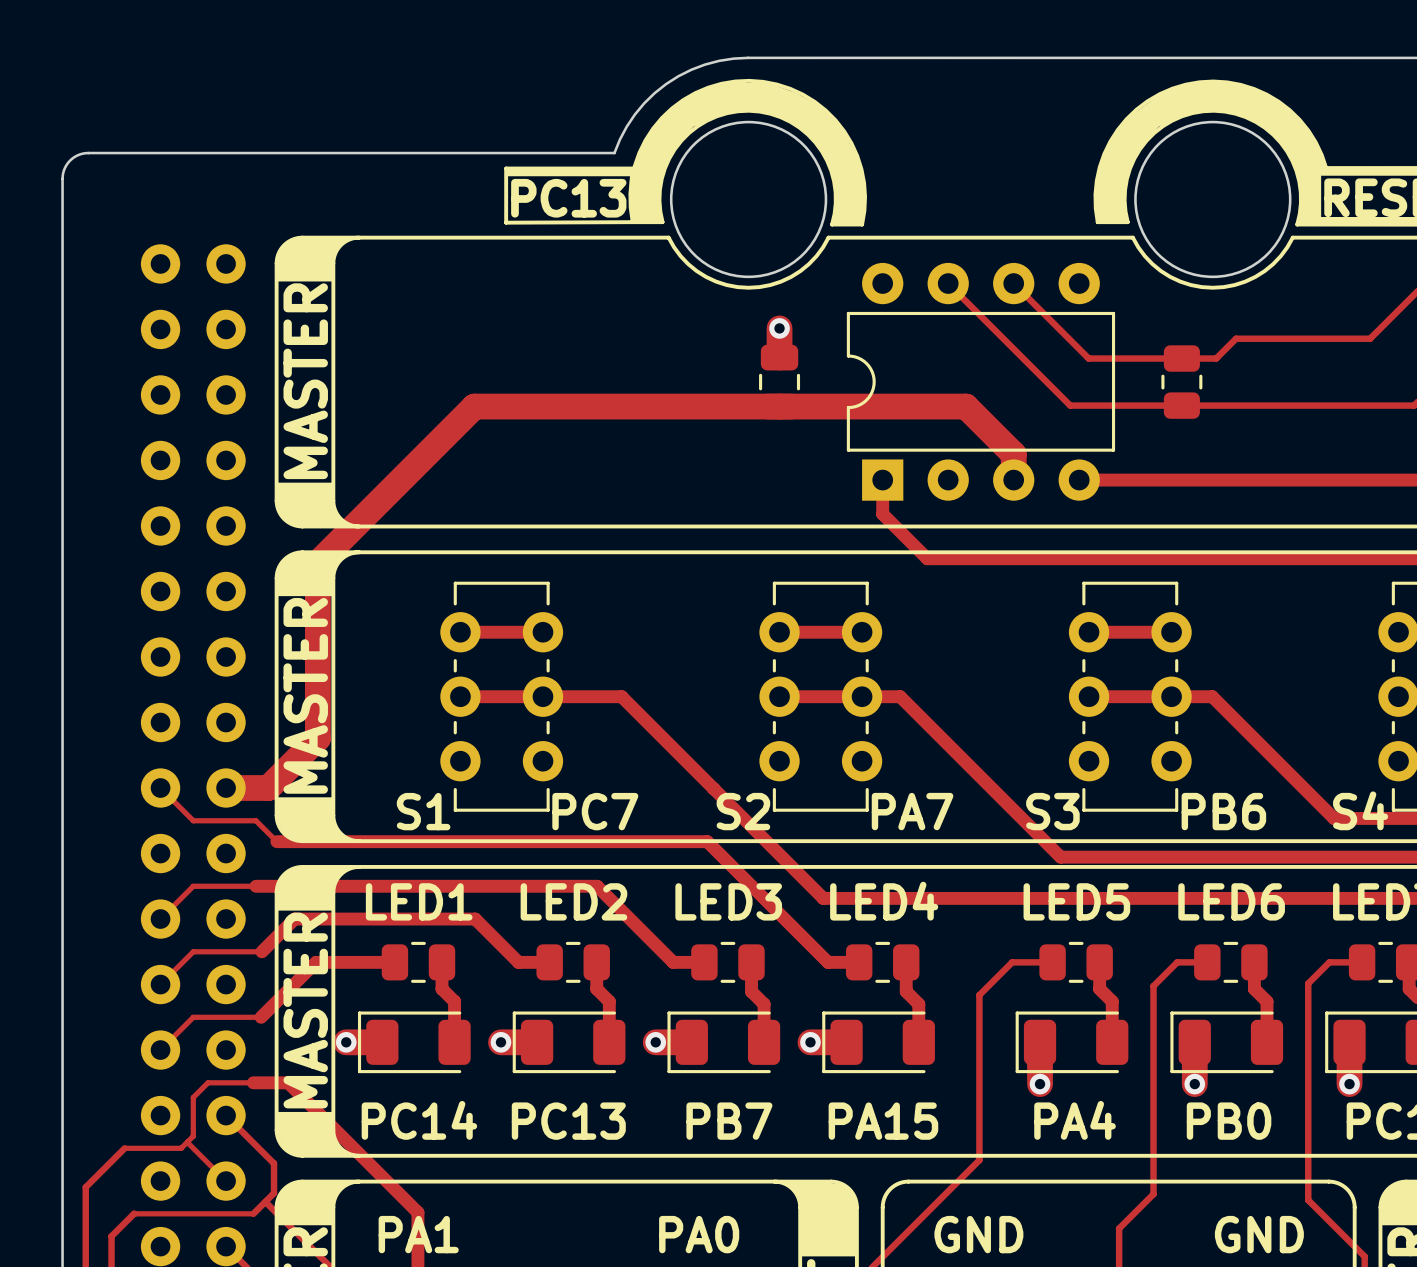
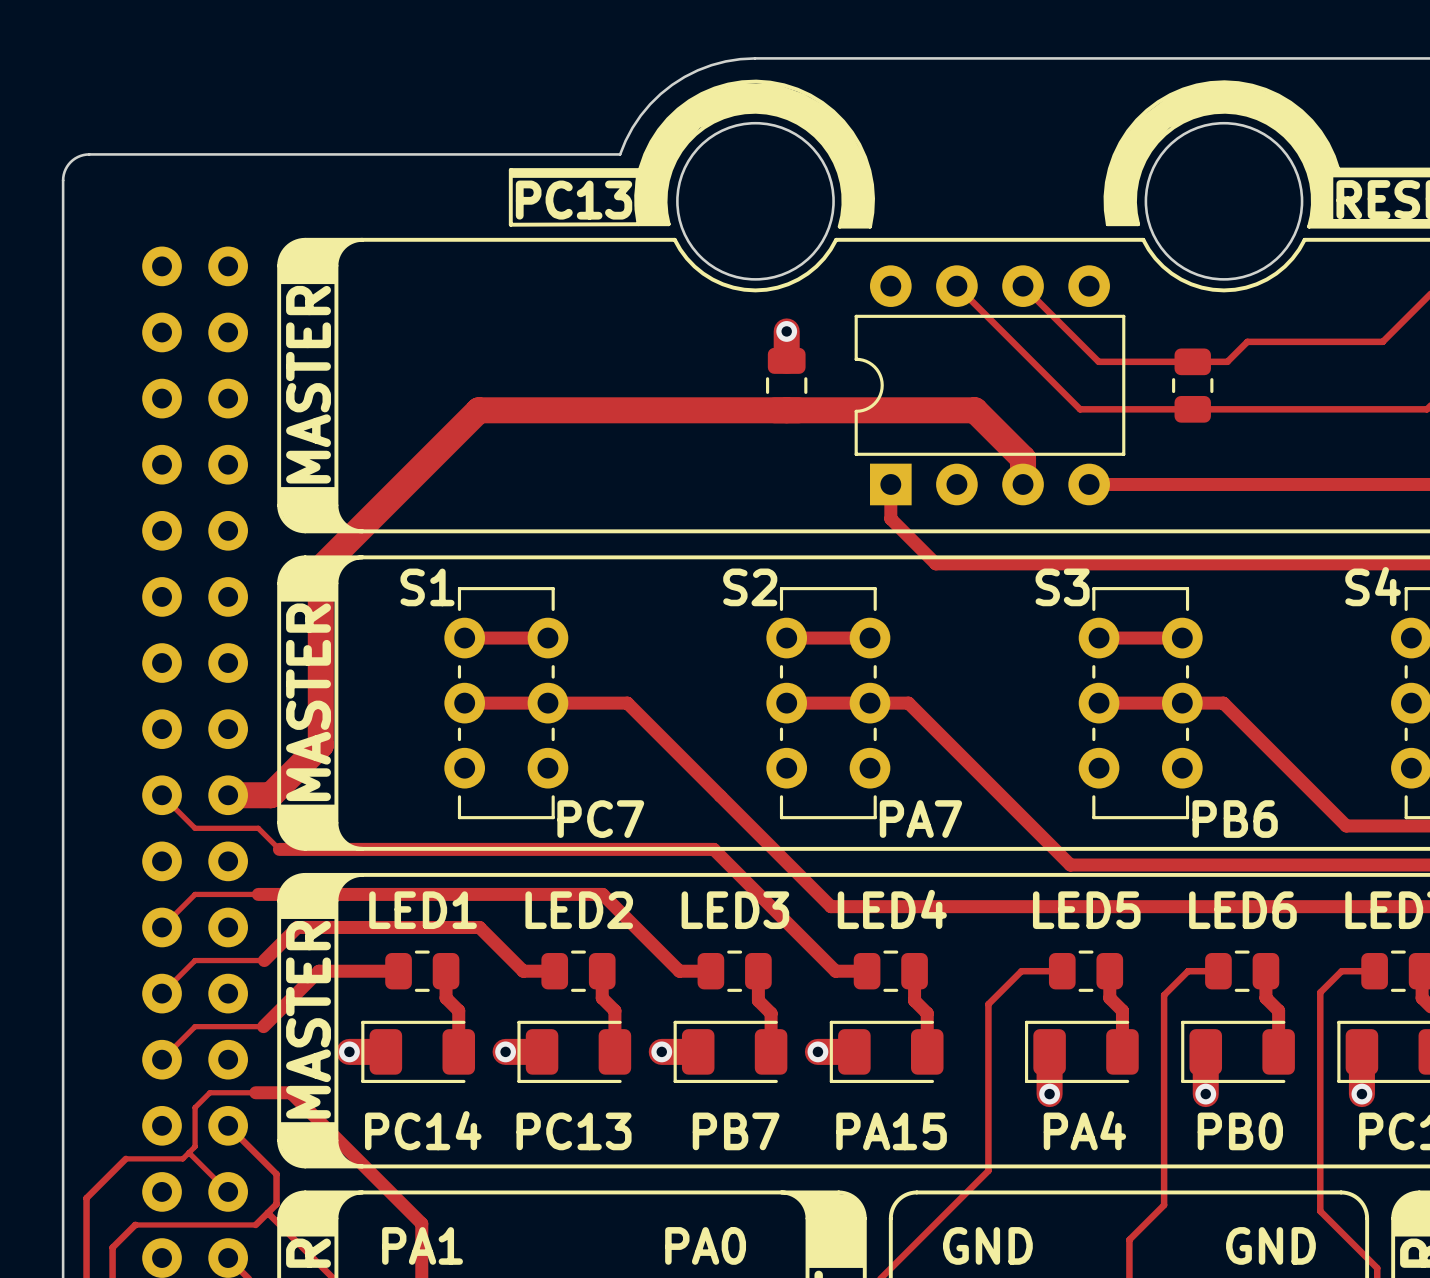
text position: S4 (1360, 810) -> S4 (1373, 586)
text position: S1 (423, 811) -> S1 (427, 587)
text position: S2 (743, 811) -> S2 (750, 587)
text position: S3 (1052, 811) -> S3 (1062, 587)

